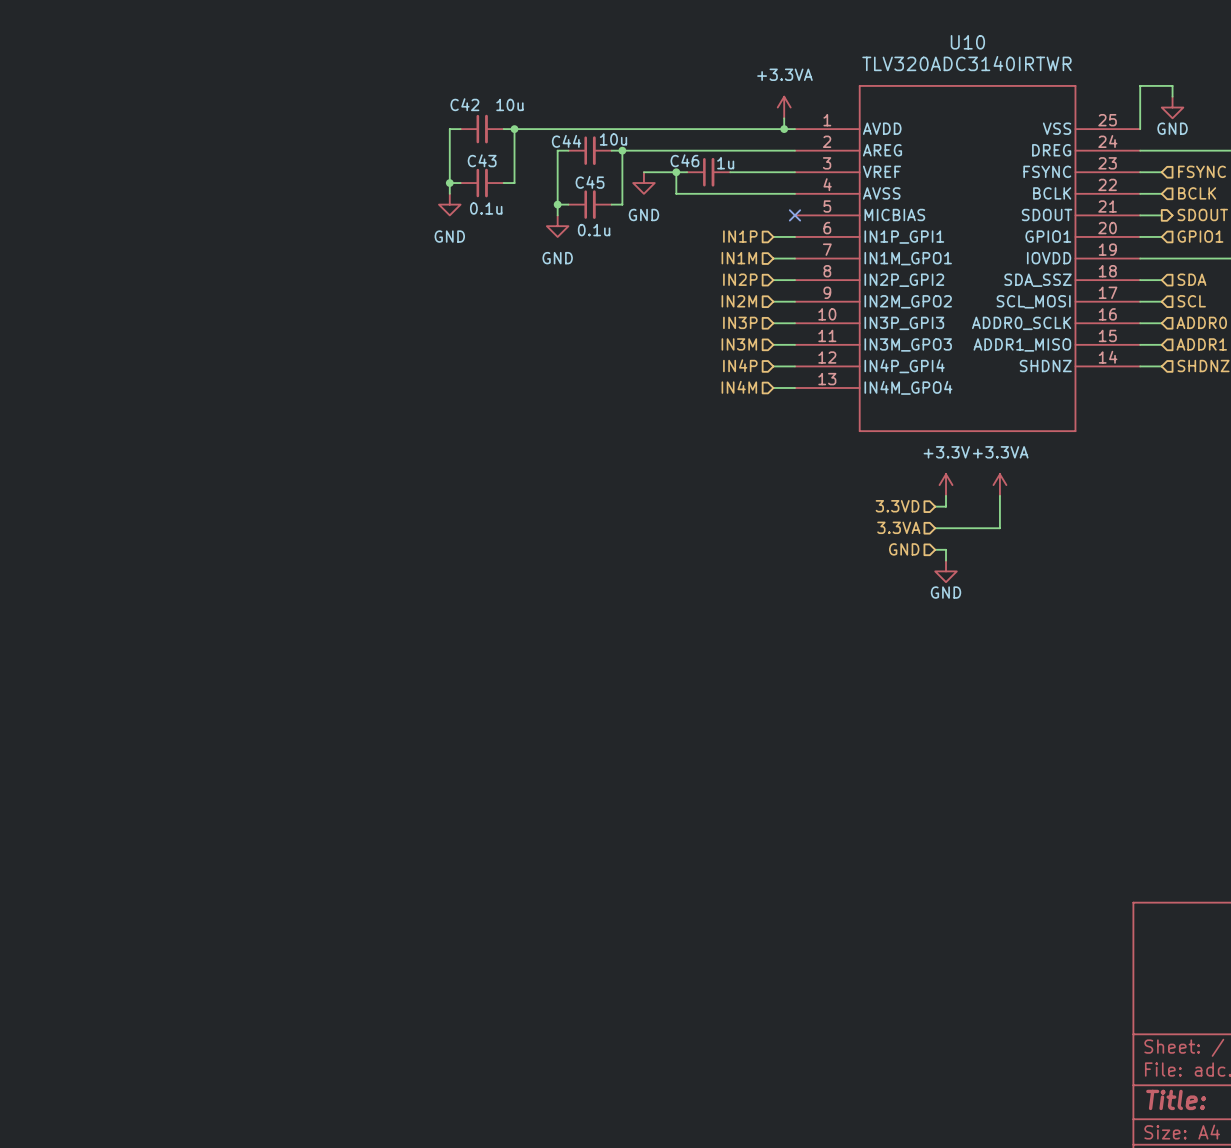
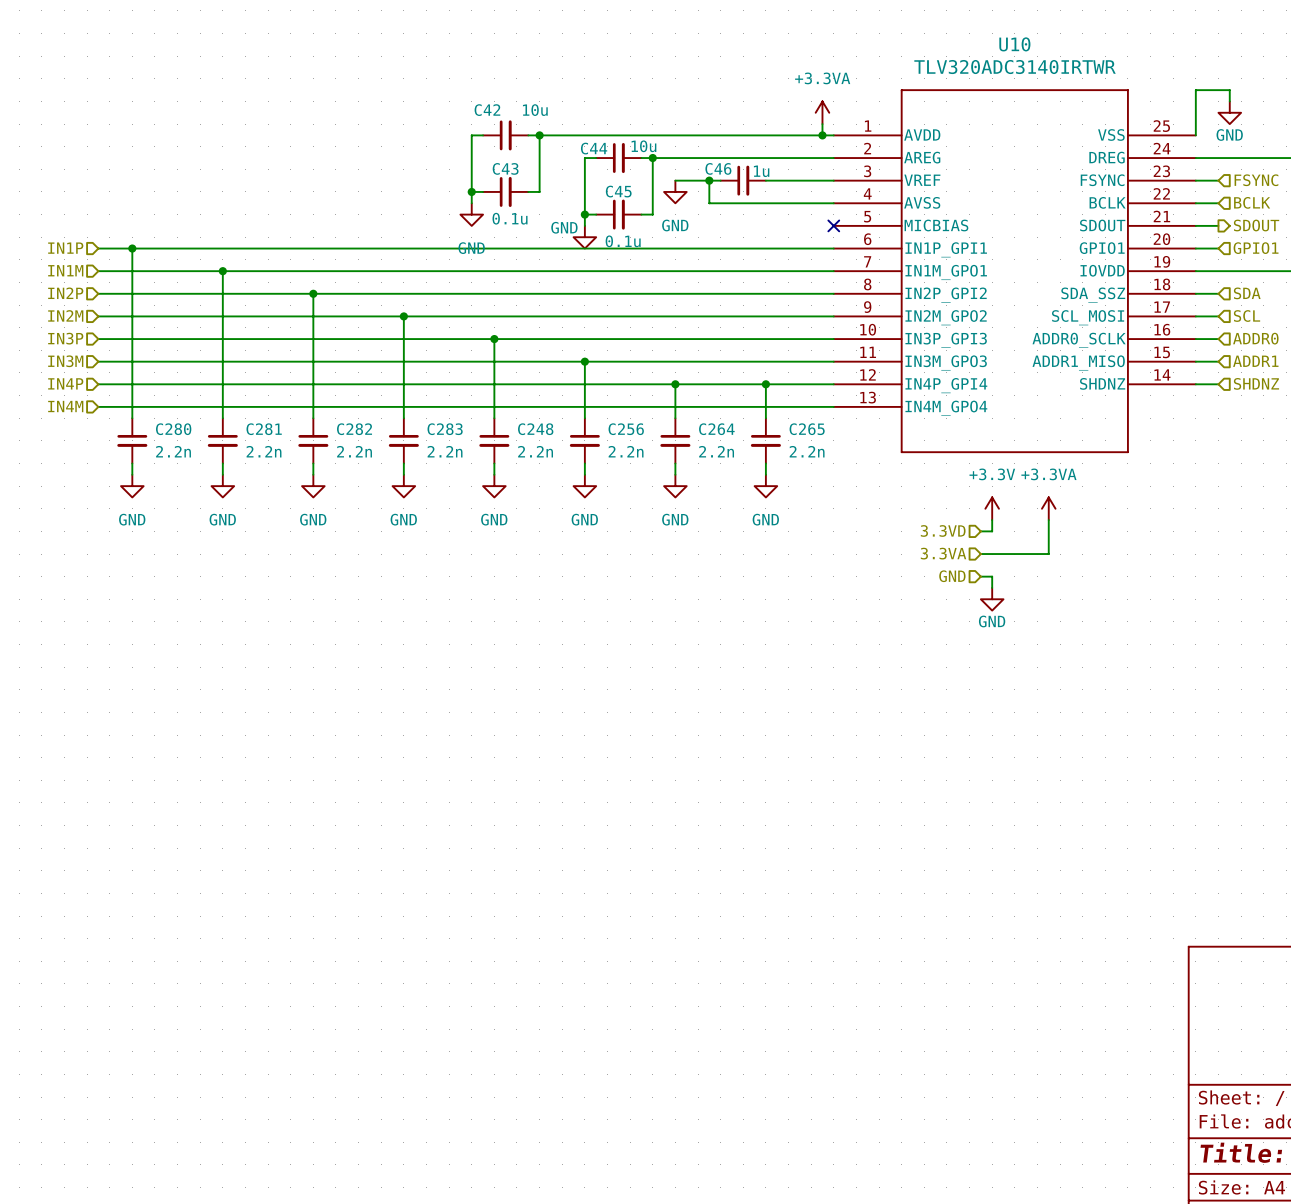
hierarchical label: none -> IN1P (65, 248)
wire: none -> (98, 248) (811, 248)
wire: none -> (132, 248) (132, 418)
junction: none -> (132, 248)
hierarchical label: IN1P (740, 236) -> none
hierarchical label: none -> IN1M (65, 270)
wire: none -> (98, 271) (811, 271)
wire: none -> (222, 271) (222, 418)
junction: none -> (222, 271)
power symbol text position: GND (557, 258) -> GND (564, 227)
hierarchical label: IN1M (739, 258) -> none
hierarchical label: none -> IN2P (65, 293)
hierarchical label: IN2P (740, 279) -> none
wire: none -> (98, 293) (811, 293)
wire: none -> (313, 293) (313, 418)
junction: none -> (313, 293)
hierarchical label: none -> IN2M (65, 315)
wire: none -> (98, 316) (811, 316)
wire: none -> (403, 316) (403, 418)
junction: none -> (403, 316)
hierarchical label: IN2M (739, 301) -> none
hierarchical label: none -> IN3P (65, 338)
hierarchical label: IN3P (740, 322) -> none
wire: none -> (98, 339) (811, 339)
wire: none -> (494, 339) (494, 418)
junction: none -> (494, 339)
hierarchical label: none -> IN3M (65, 361)
wire: none -> (98, 361) (811, 361)
wire: none -> (584, 361) (584, 418)
junction: none -> (584, 361)
hierarchical label: IN3M (739, 344) -> none
hierarchical label: none -> IN4P (65, 383)
hierarchical label: IN4P (740, 365) -> none
wire: none -> (98, 384) (811, 384)
wire: none -> (675, 384) (675, 418)
junction: none -> (675, 384)
wire: none -> (765, 384) (765, 418)
junction: none -> (765, 384)
hierarchical label: none -> IN4M (65, 406)
wire: none -> (98, 406) (811, 406)
hierarchical label: IN4M (739, 387) -> none
C280: none -> 2.2n (132, 440)
C281: none -> 2.2n (222, 440)
C282: none -> 2.2n (313, 440)
C283: none -> 2.2n (403, 440)
C248: none -> 2.2n (494, 440)
C256: none -> 2.2n (584, 440)
C264: none -> 2.2n (675, 440)
C265: none -> 2.2n (765, 440)
wire: none -> (132, 463) (132, 474)
wire: none -> (222, 463) (222, 474)
wire: none -> (313, 463) (313, 474)
wire: none -> (403, 463) (403, 474)
wire: none -> (494, 463) (494, 474)
wire: none -> (584, 463) (584, 474)
wire: none -> (675, 463) (675, 474)
wire: none -> (765, 463) (765, 474)
power symbol: none -> GND (132, 486)
power symbol: none -> GND (222, 486)
power symbol: none -> GND (313, 486)
power symbol: none -> GND (403, 486)
power symbol: none -> GND (494, 486)
power symbol: none -> GND (584, 486)
power symbol: none -> GND (675, 486)
power symbol: none -> GND (765, 486)

